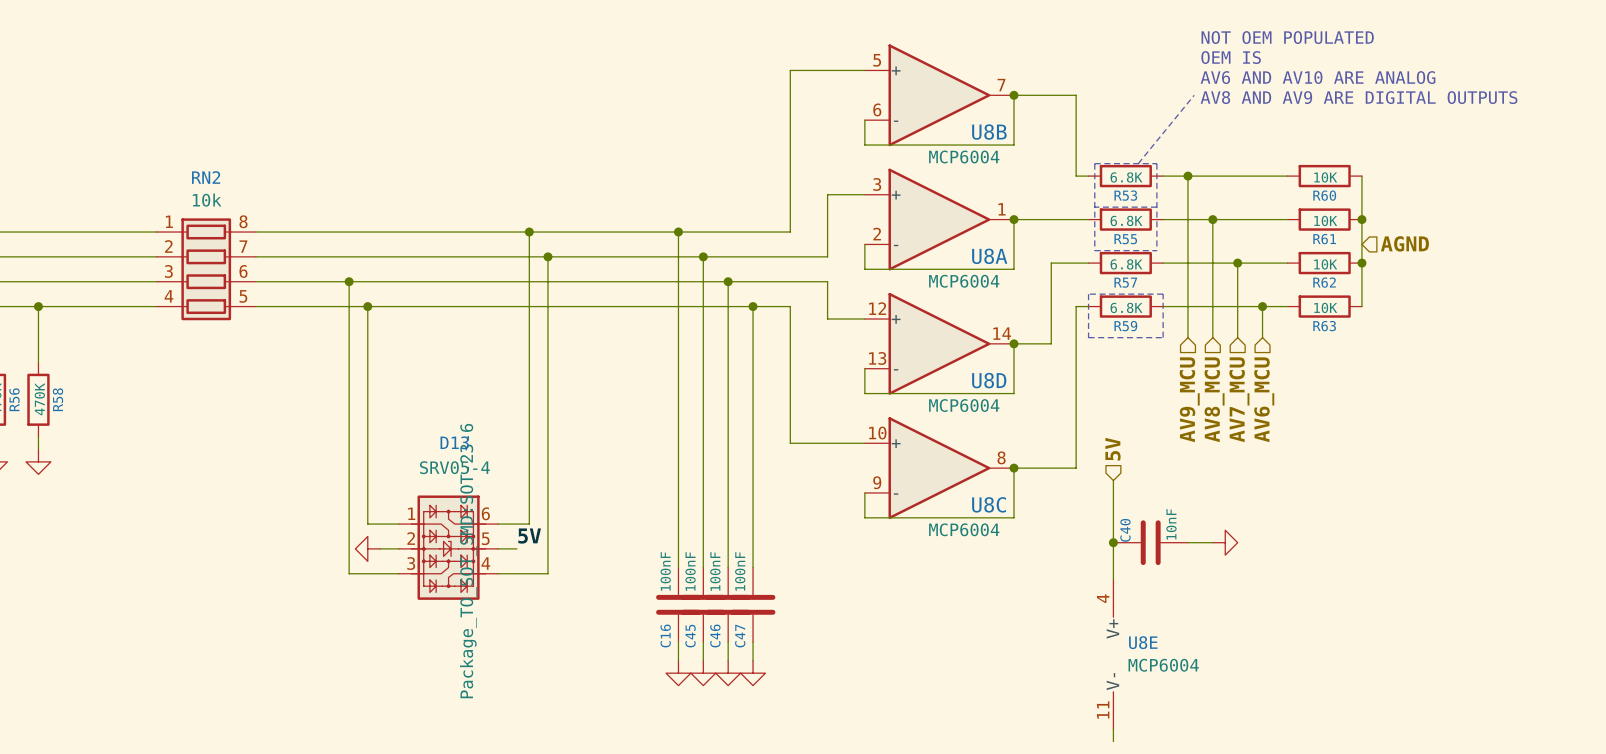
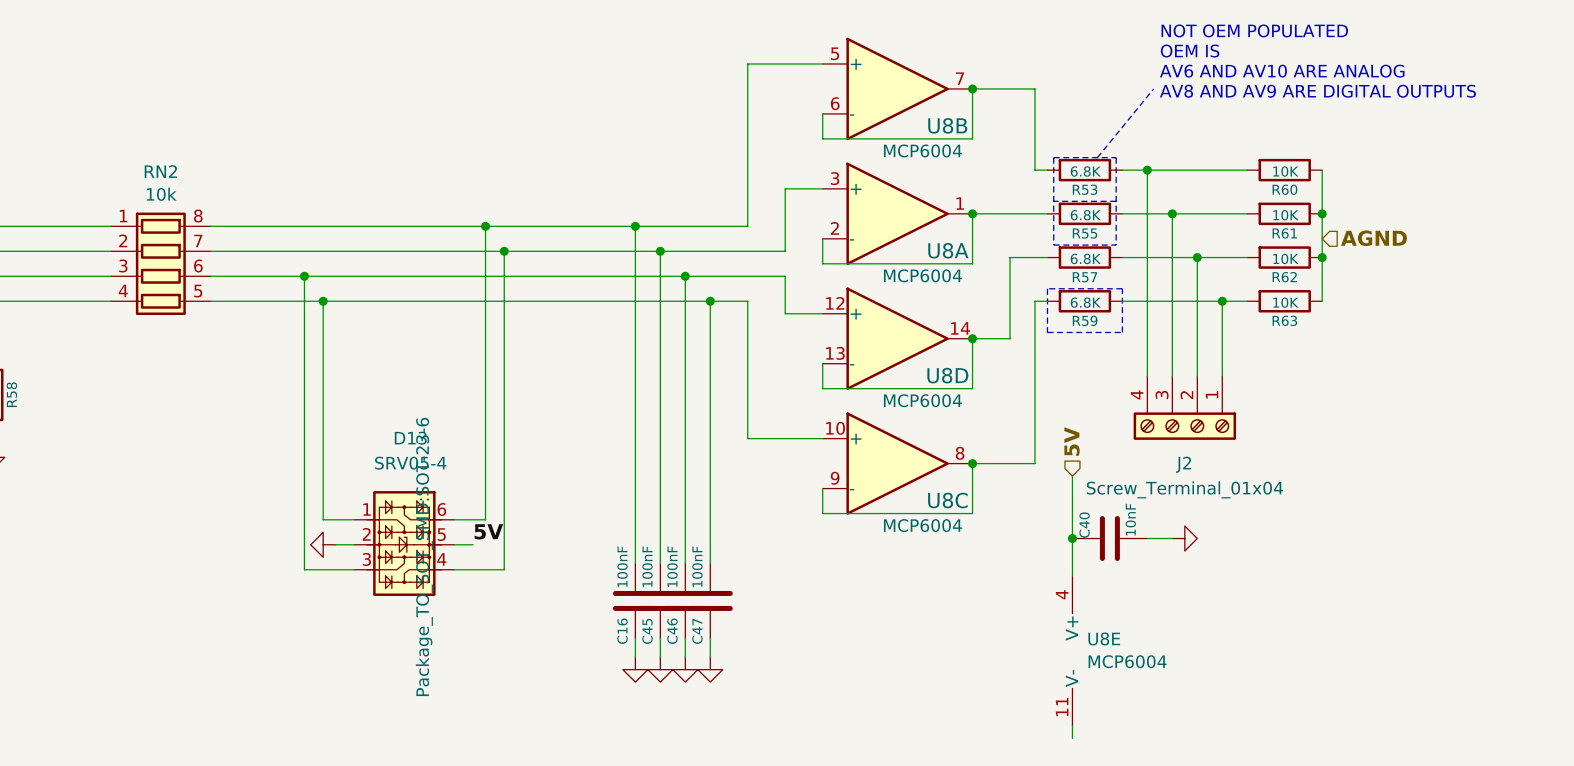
wire: none -> (1147, 332) (1147, 376)
wire: none -> (1172, 332) (1172, 376)
wire: none -> (1197, 332) (1197, 376)
wire: none -> (1222, 332) (1222, 376)
hierarchical label: AV9_MCU (1189, 399) -> none
hierarchical label: AV8_MCU (1214, 399) -> none
hierarchical label: AV7_MCU (1239, 399) -> none
hierarchical label: AV6_MCU (1264, 399) -> none
J2: none -> Screw_Terminal_01x04 (1184, 408)

